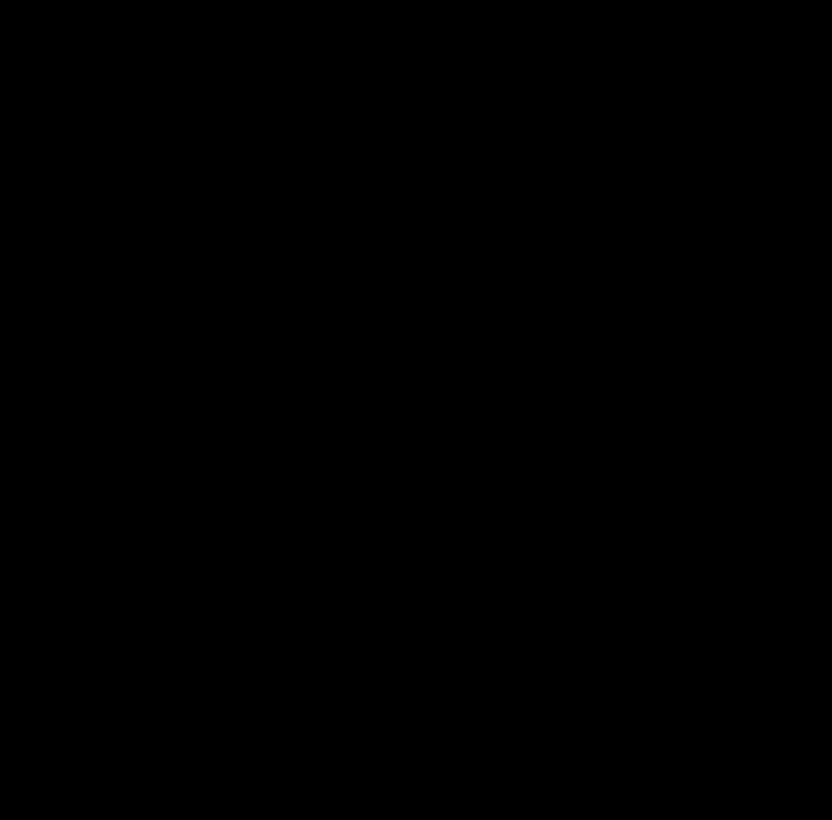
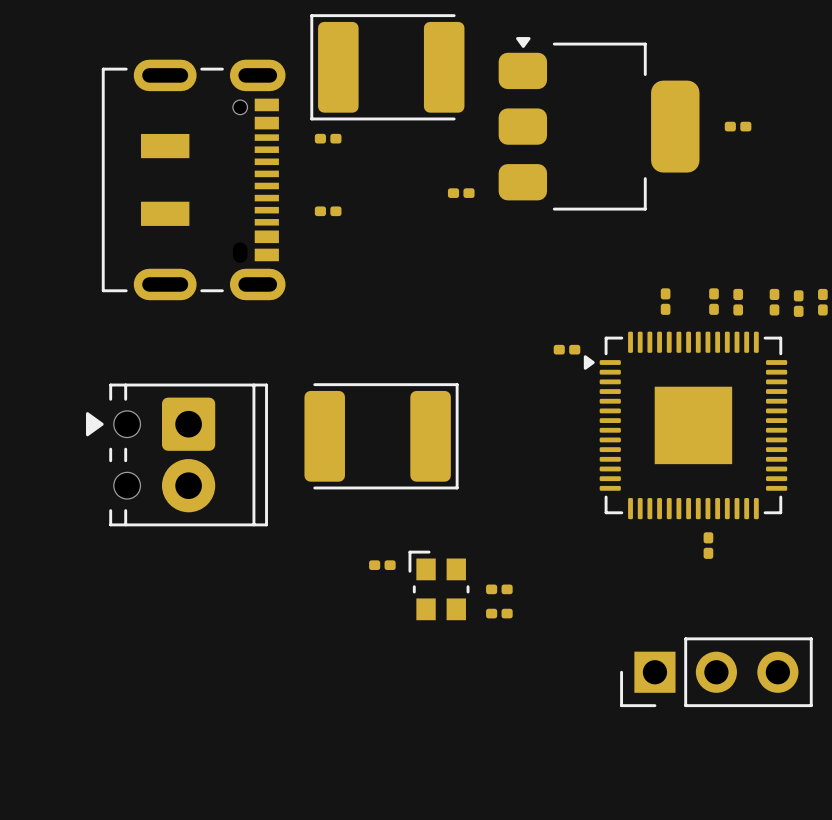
part: none -> (387, 67)
part: none -> (599, 123)
part: none -> (738, 126)
part: none -> (328, 138)
part: none -> (193, 179)
part: none -> (461, 193)
part: none -> (328, 211)
part: none -> (665, 301)
part: none -> (714, 301)
part: none -> (738, 302)
part: none -> (774, 302)
part: none -> (822, 302)
part: none -> (798, 303)
part: none -> (566, 349)
part: none -> (685, 425)
part: none -> (381, 436)
part: none -> (176, 454)
part: none -> (708, 545)
part: none -> (382, 565)
part: none -> (438, 585)
part: none -> (499, 589)
part: none -> (499, 613)
part: none -> (716, 672)

